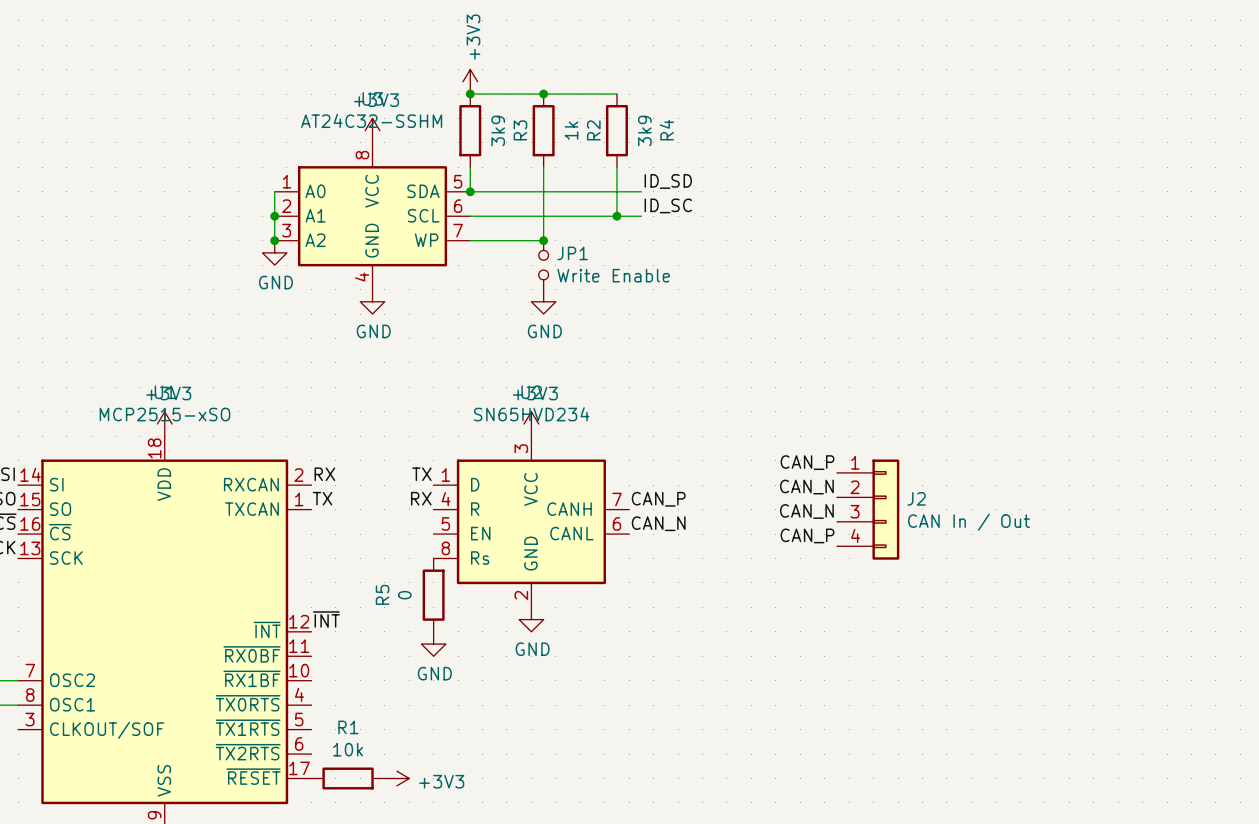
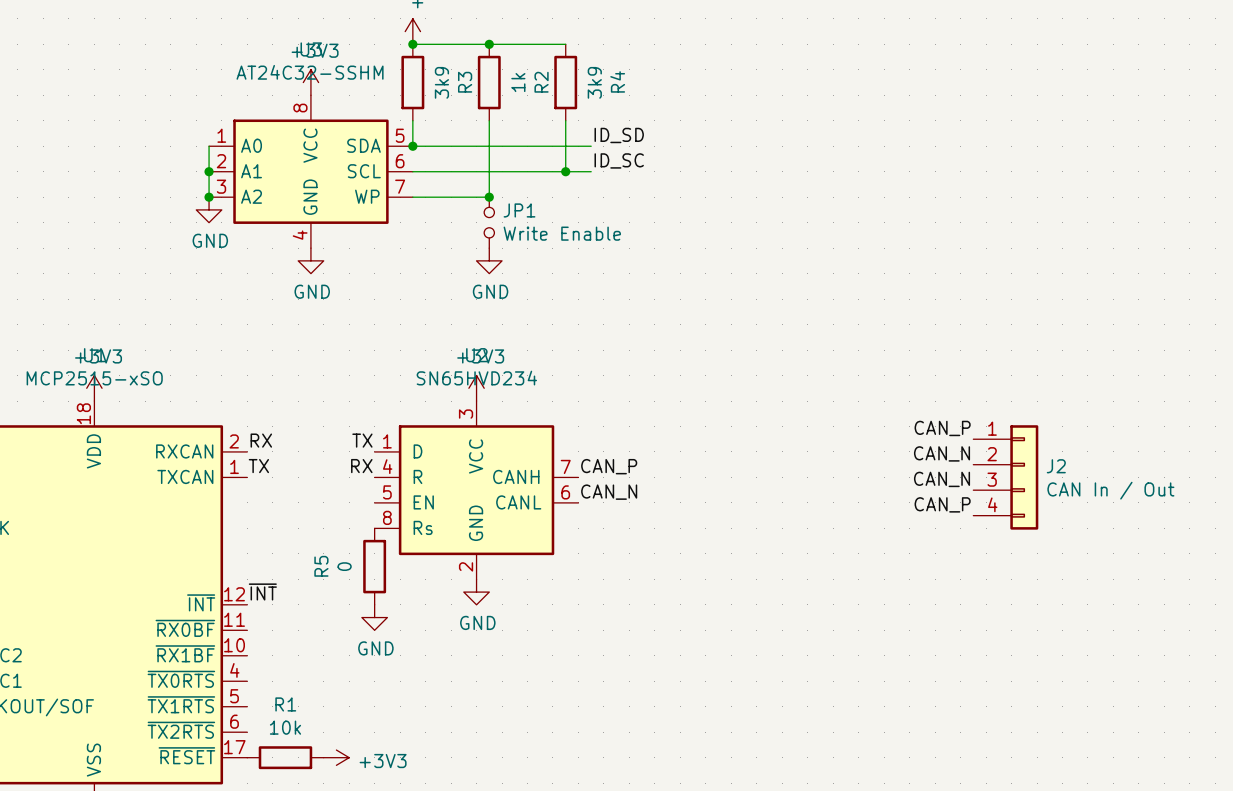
label: CAN_P (807, 462) -> none
label: none -> CAN_P (942, 428)
label: CAN_N (806, 487) -> none
label: none -> CAN_N (942, 453)
J2 position: (868, 509) -> (1005, 477)
label: CAN_N (806, 511) -> none
label: none -> CAN_N (942, 479)
label: CAN_P (807, 535) -> none
label: none -> CAN_P (942, 504)

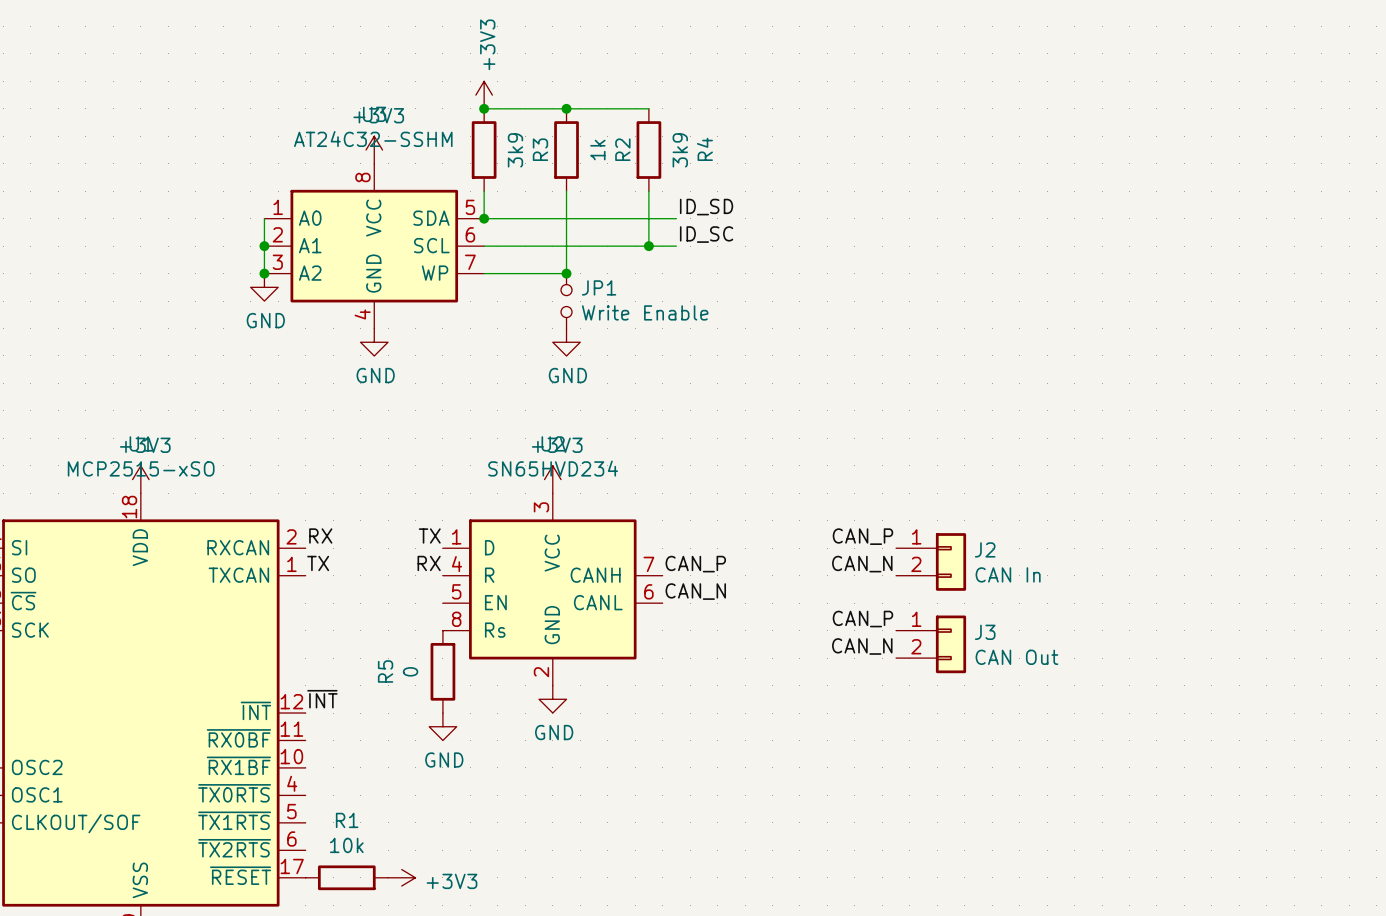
J2 symbol: [973, 425, 1039, 530] -> [896, 533, 967, 591]
label: CAN_P (942, 428) -> none
label: none -> CAN_P (862, 536)
label: CAN_N (942, 453) -> none
label: none -> CAN_N (862, 564)
label: CAN_N (942, 479) -> none
J2 value: CAN In / Out (1110, 490) -> CAN In (1008, 574)
label: CAN_P (942, 504) -> none
label: none -> CAN_P (862, 619)
J3: none -> CAN Out (931, 644)
label: none -> CAN_N (862, 646)

